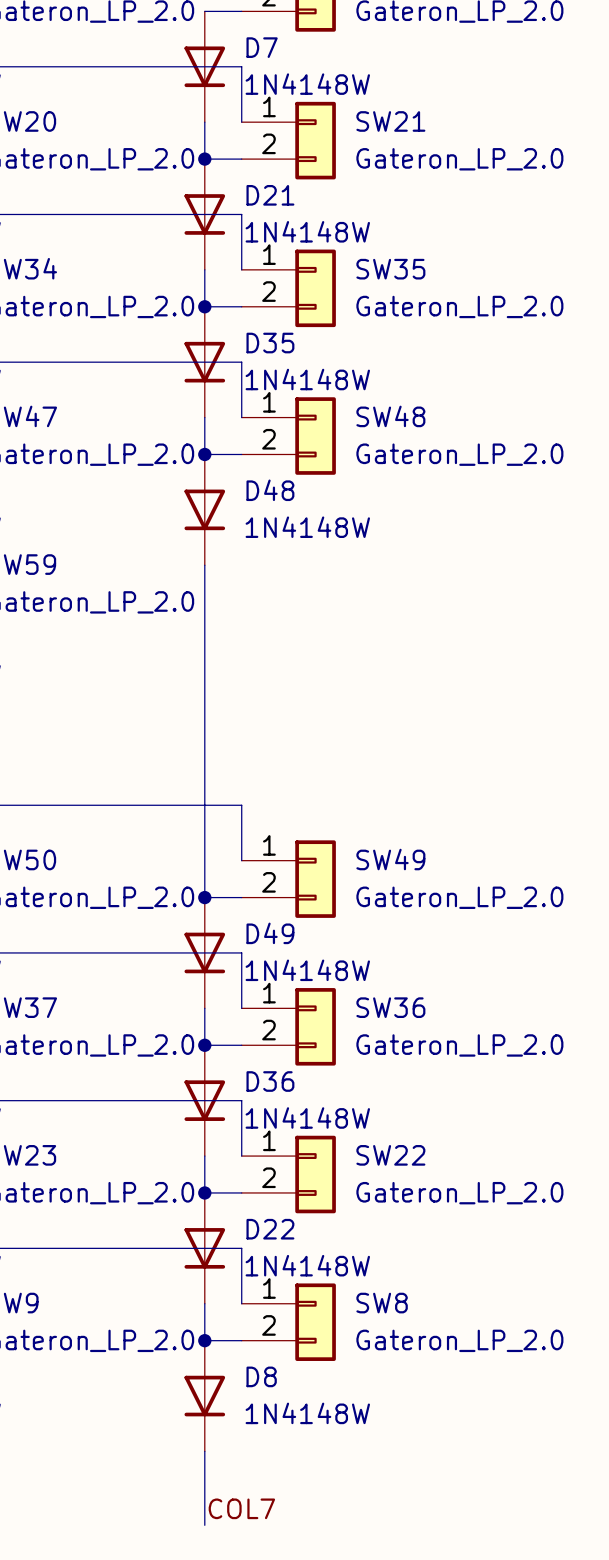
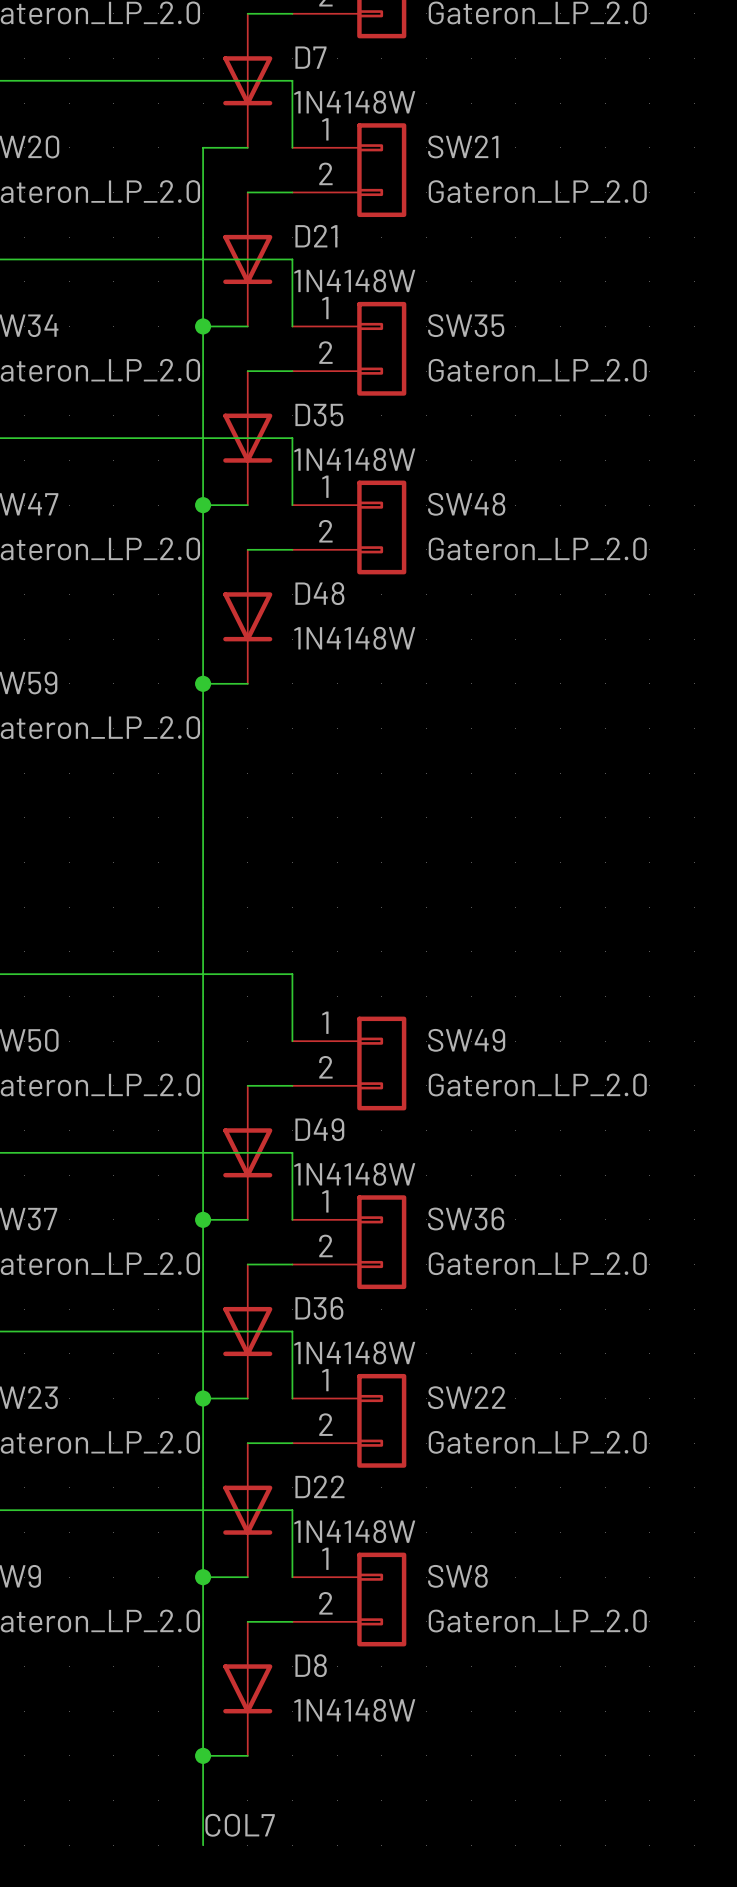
wire: (204, 122) (204, 159) -> (247, 147) (203, 147) (203, 1845)
junction: (204, 159) -> none
wire: (204, 269) (204, 306) -> (247, 326) (203, 326)
junction position: (204, 306) -> (203, 326)
wire: (204, 417) (204, 454) -> (247, 505) (203, 505)
junction position: (204, 454) -> (203, 505)
junction: none -> (203, 683)
wire: (204, 565) (204, 897) -> (247, 683) (203, 683)
junction: (204, 897) -> none
wire: (204, 1008) (204, 1045) -> (247, 1219) (203, 1219)
junction position: (204, 1045) -> (203, 1219)
wire: (204, 1156) (204, 1192) -> (247, 1398) (203, 1398)
junction position: (204, 1192) -> (203, 1398)
wire: (204, 1303) (204, 1340) -> (247, 1577) (203, 1577)
junction position: (204, 1340) -> (203, 1577)
junction: none -> (203, 1755)
wire: (204, 1451) (204, 1525) -> (247, 1755) (203, 1755)
label position: COL7 (241, 1508) -> COL7 (240, 1825)

